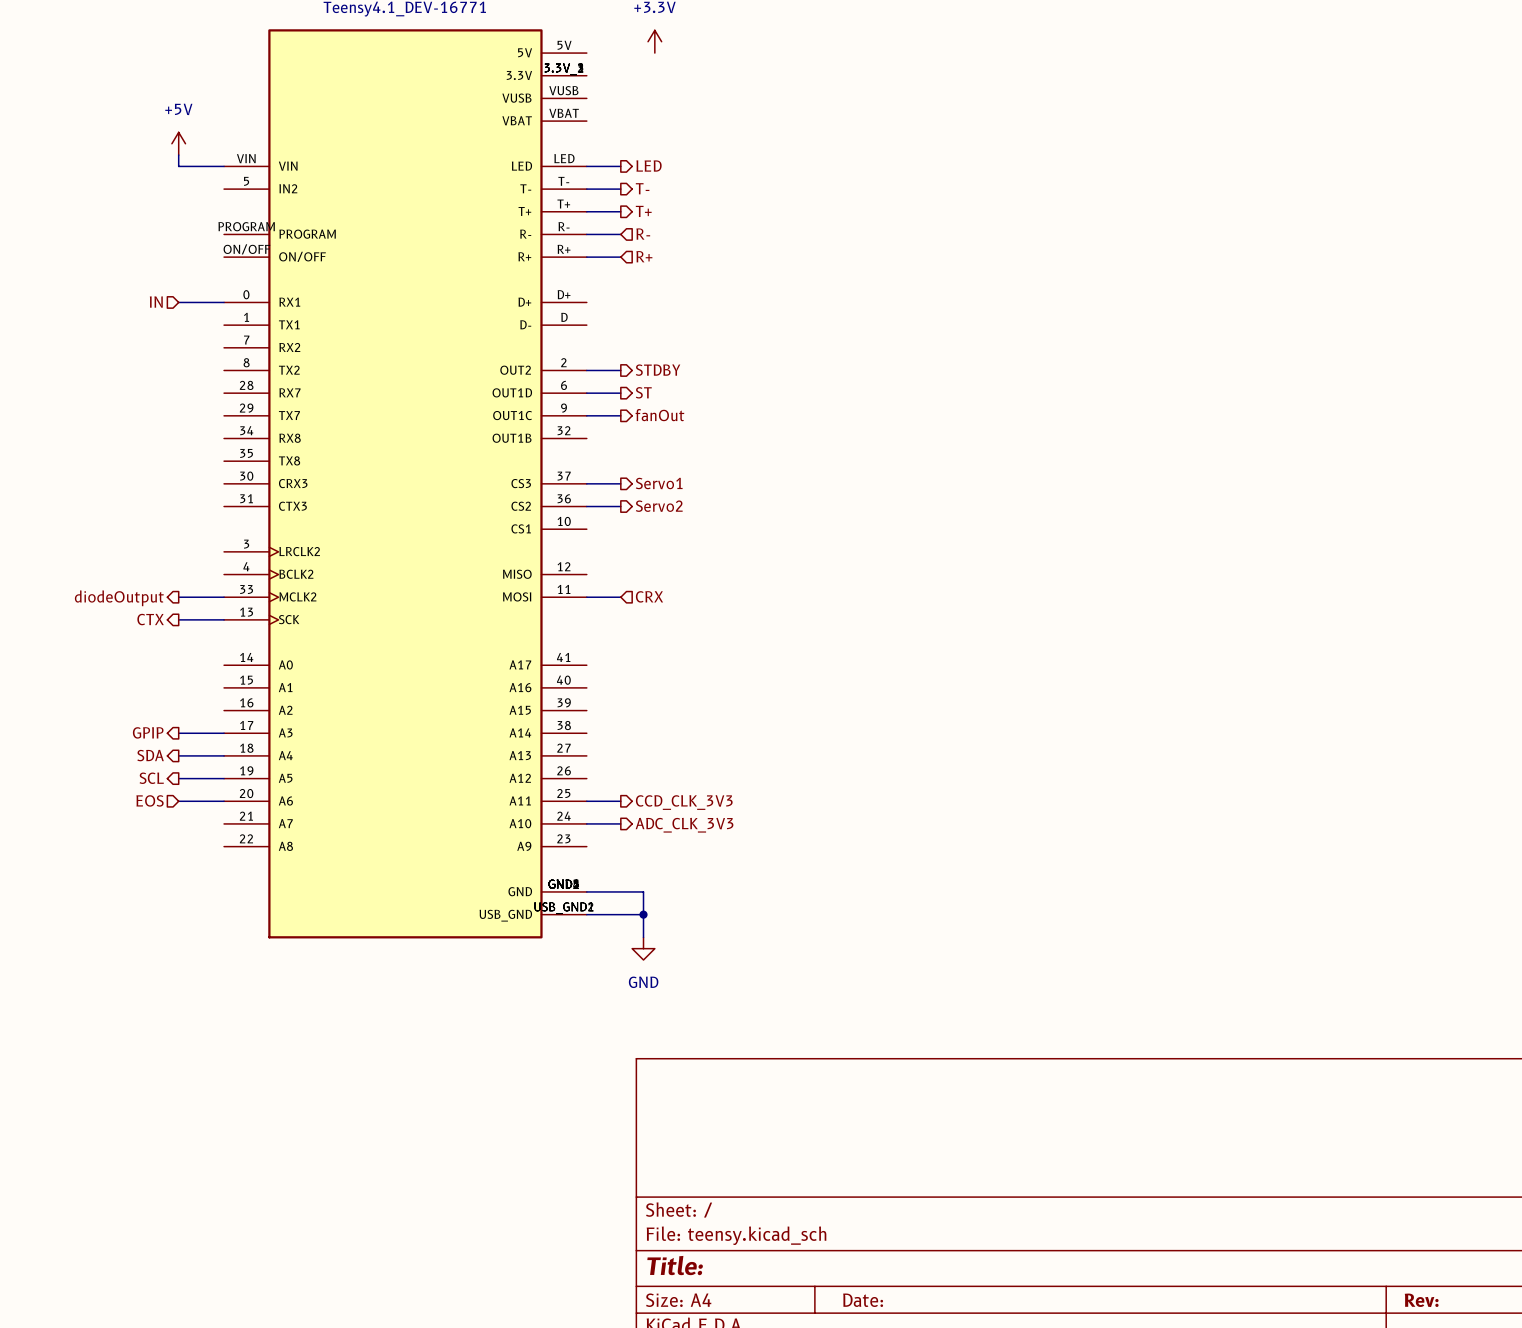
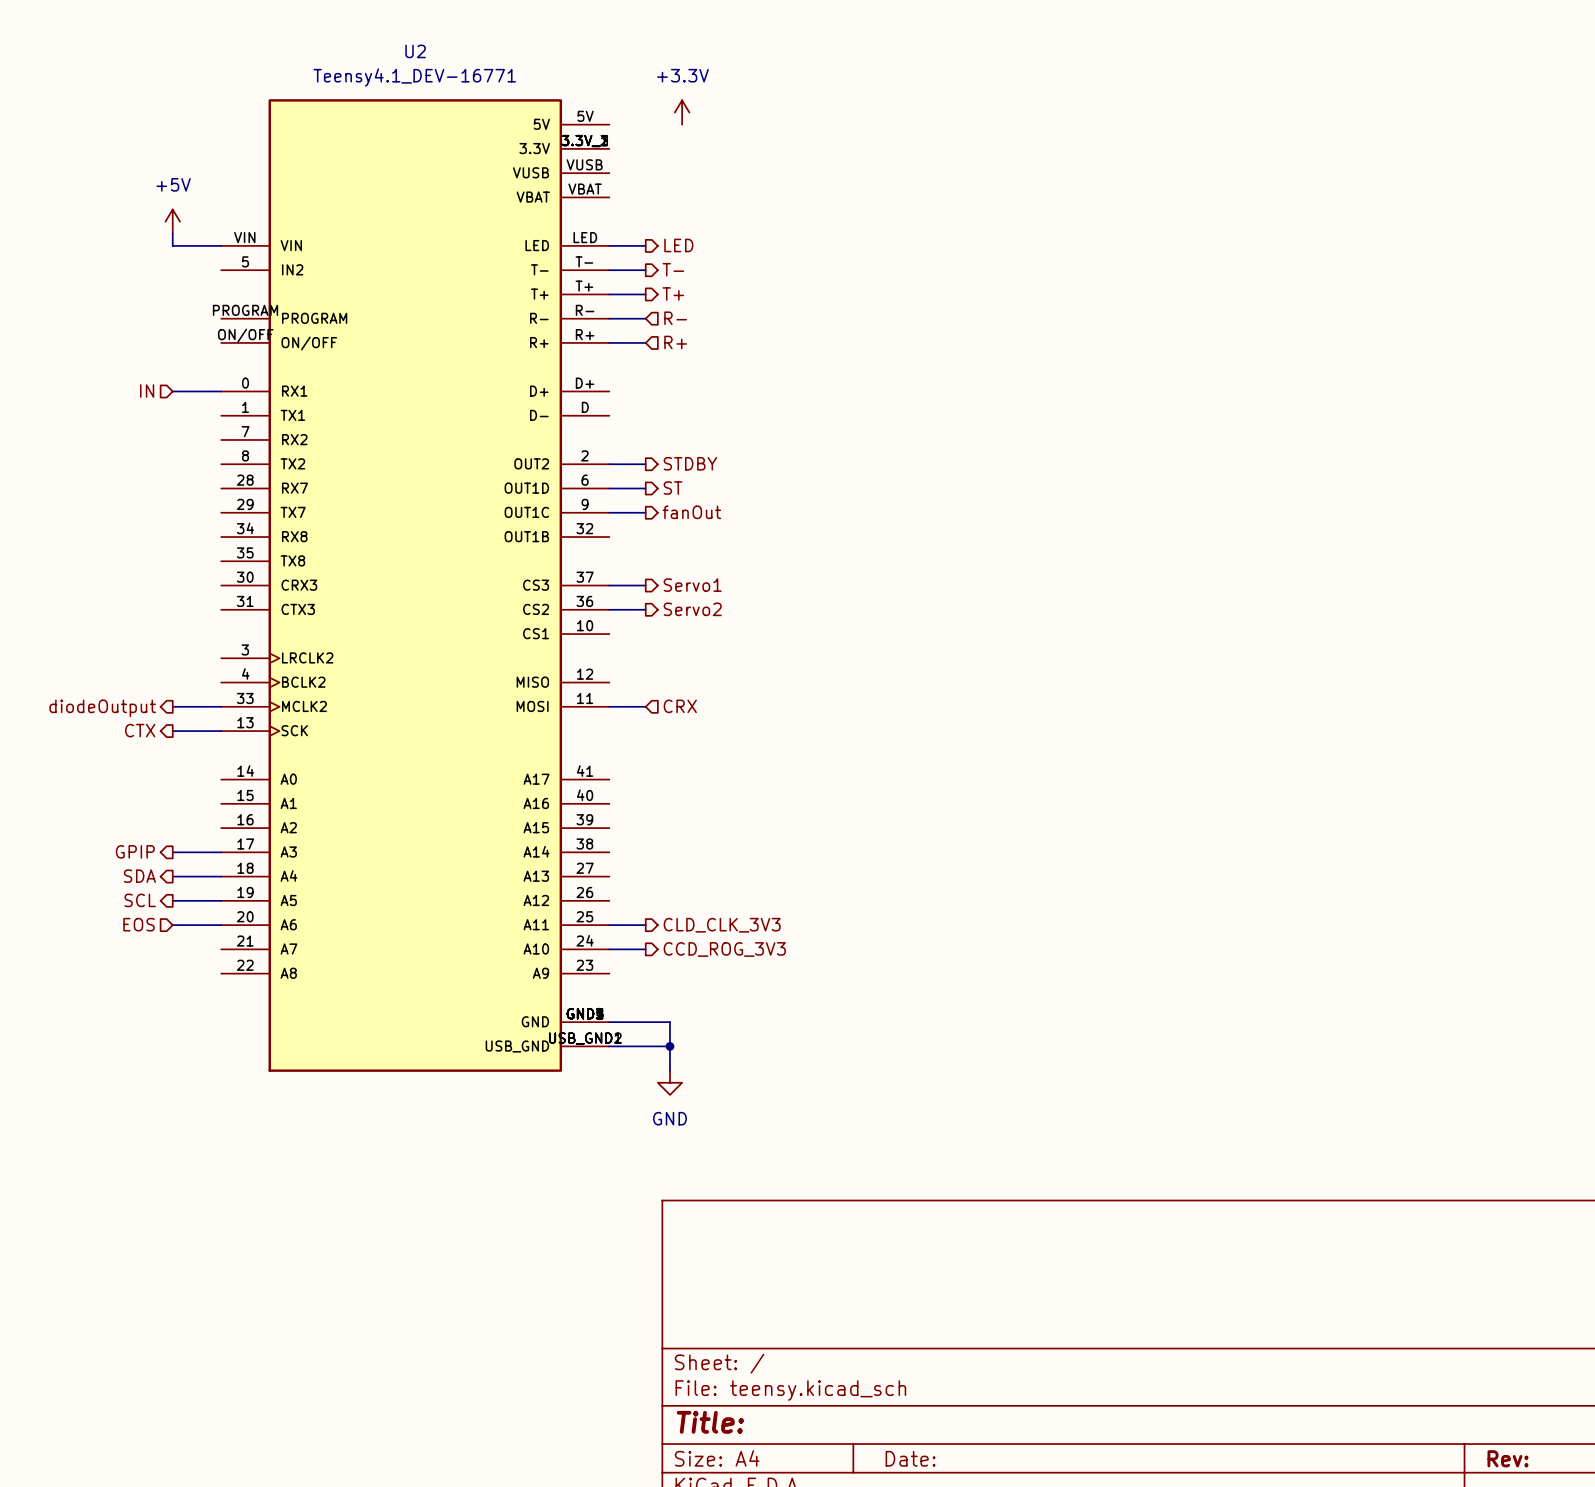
hierarchical label: CCD_CLK_3V3 (684, 802) -> CLD_CLK_3V3 (722, 925)
hierarchical label: ADC_CLK_3V3 (684, 825) -> CCD_ROG_3V3 (724, 949)

